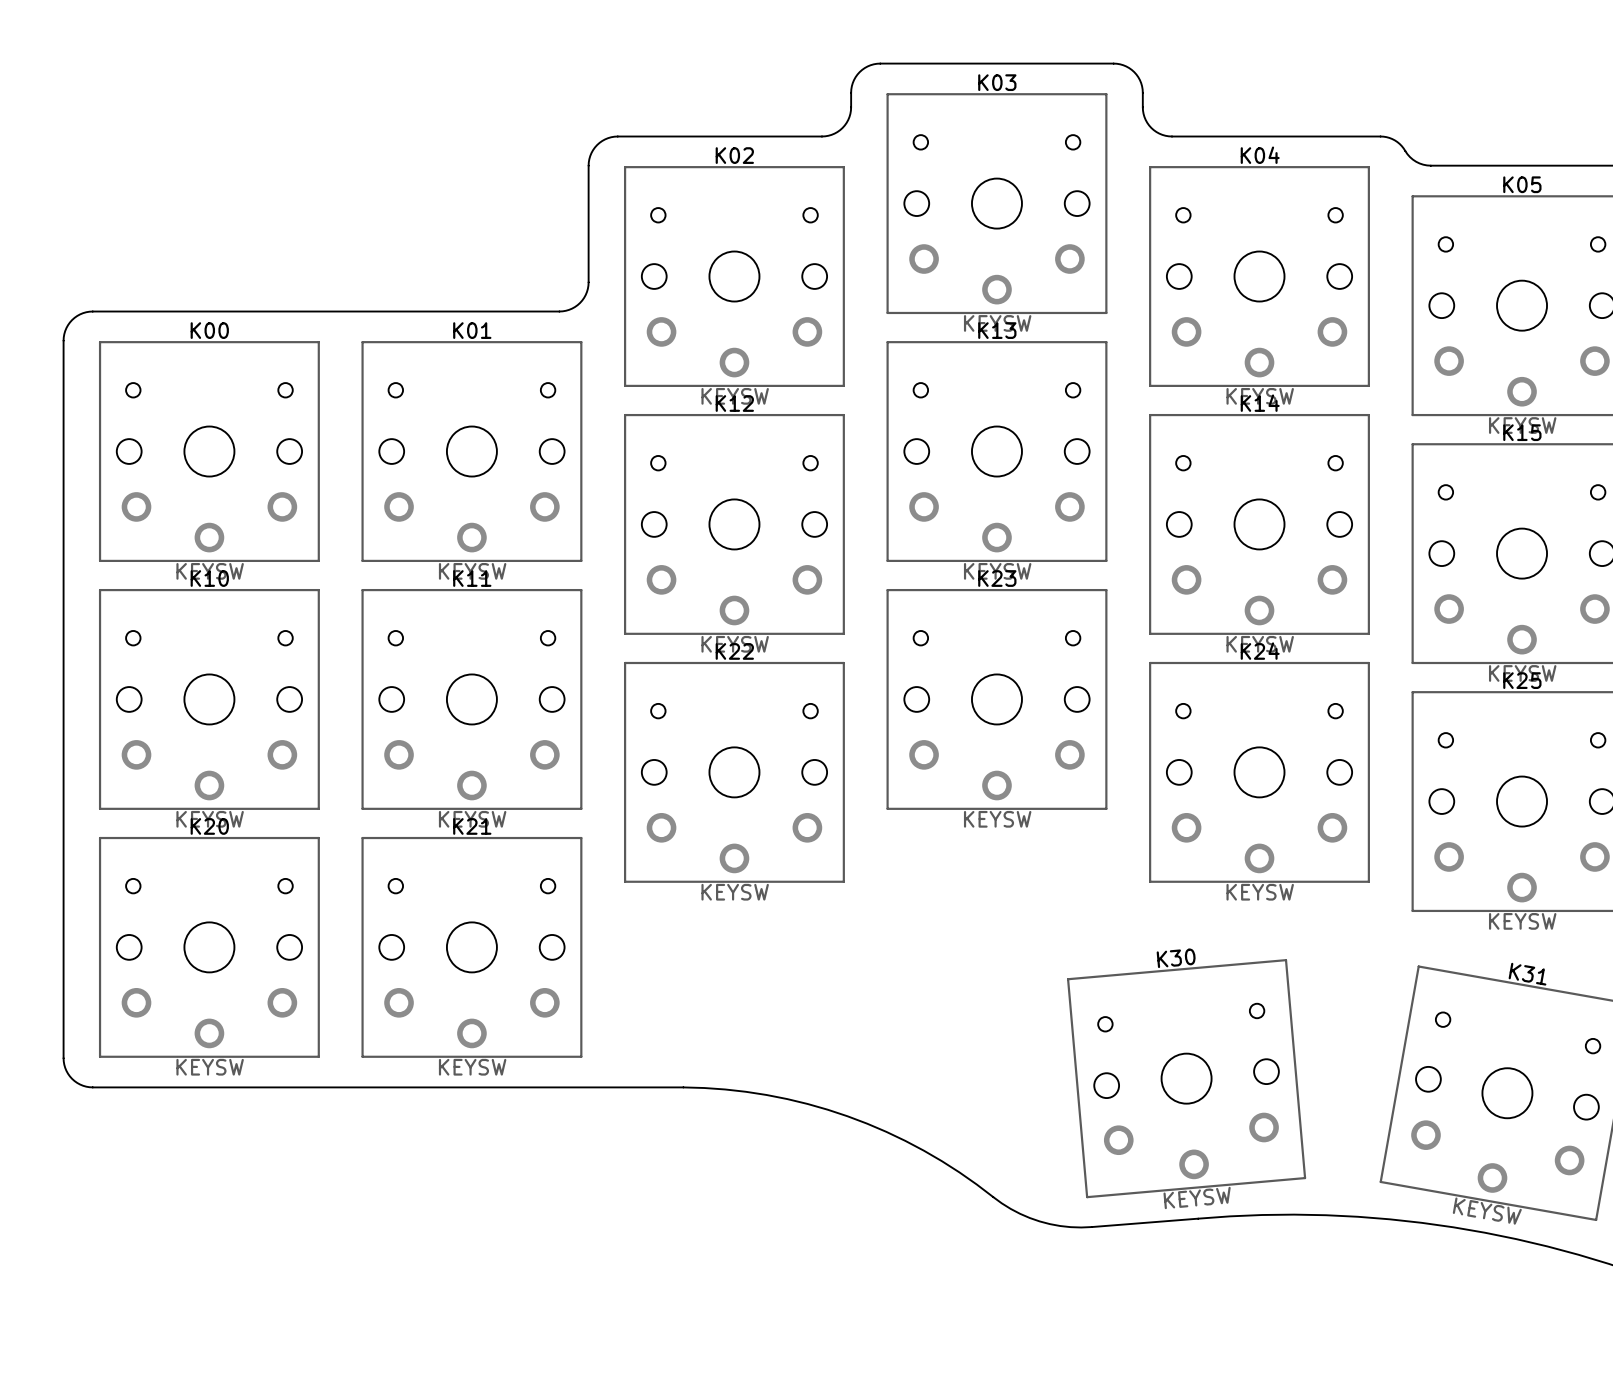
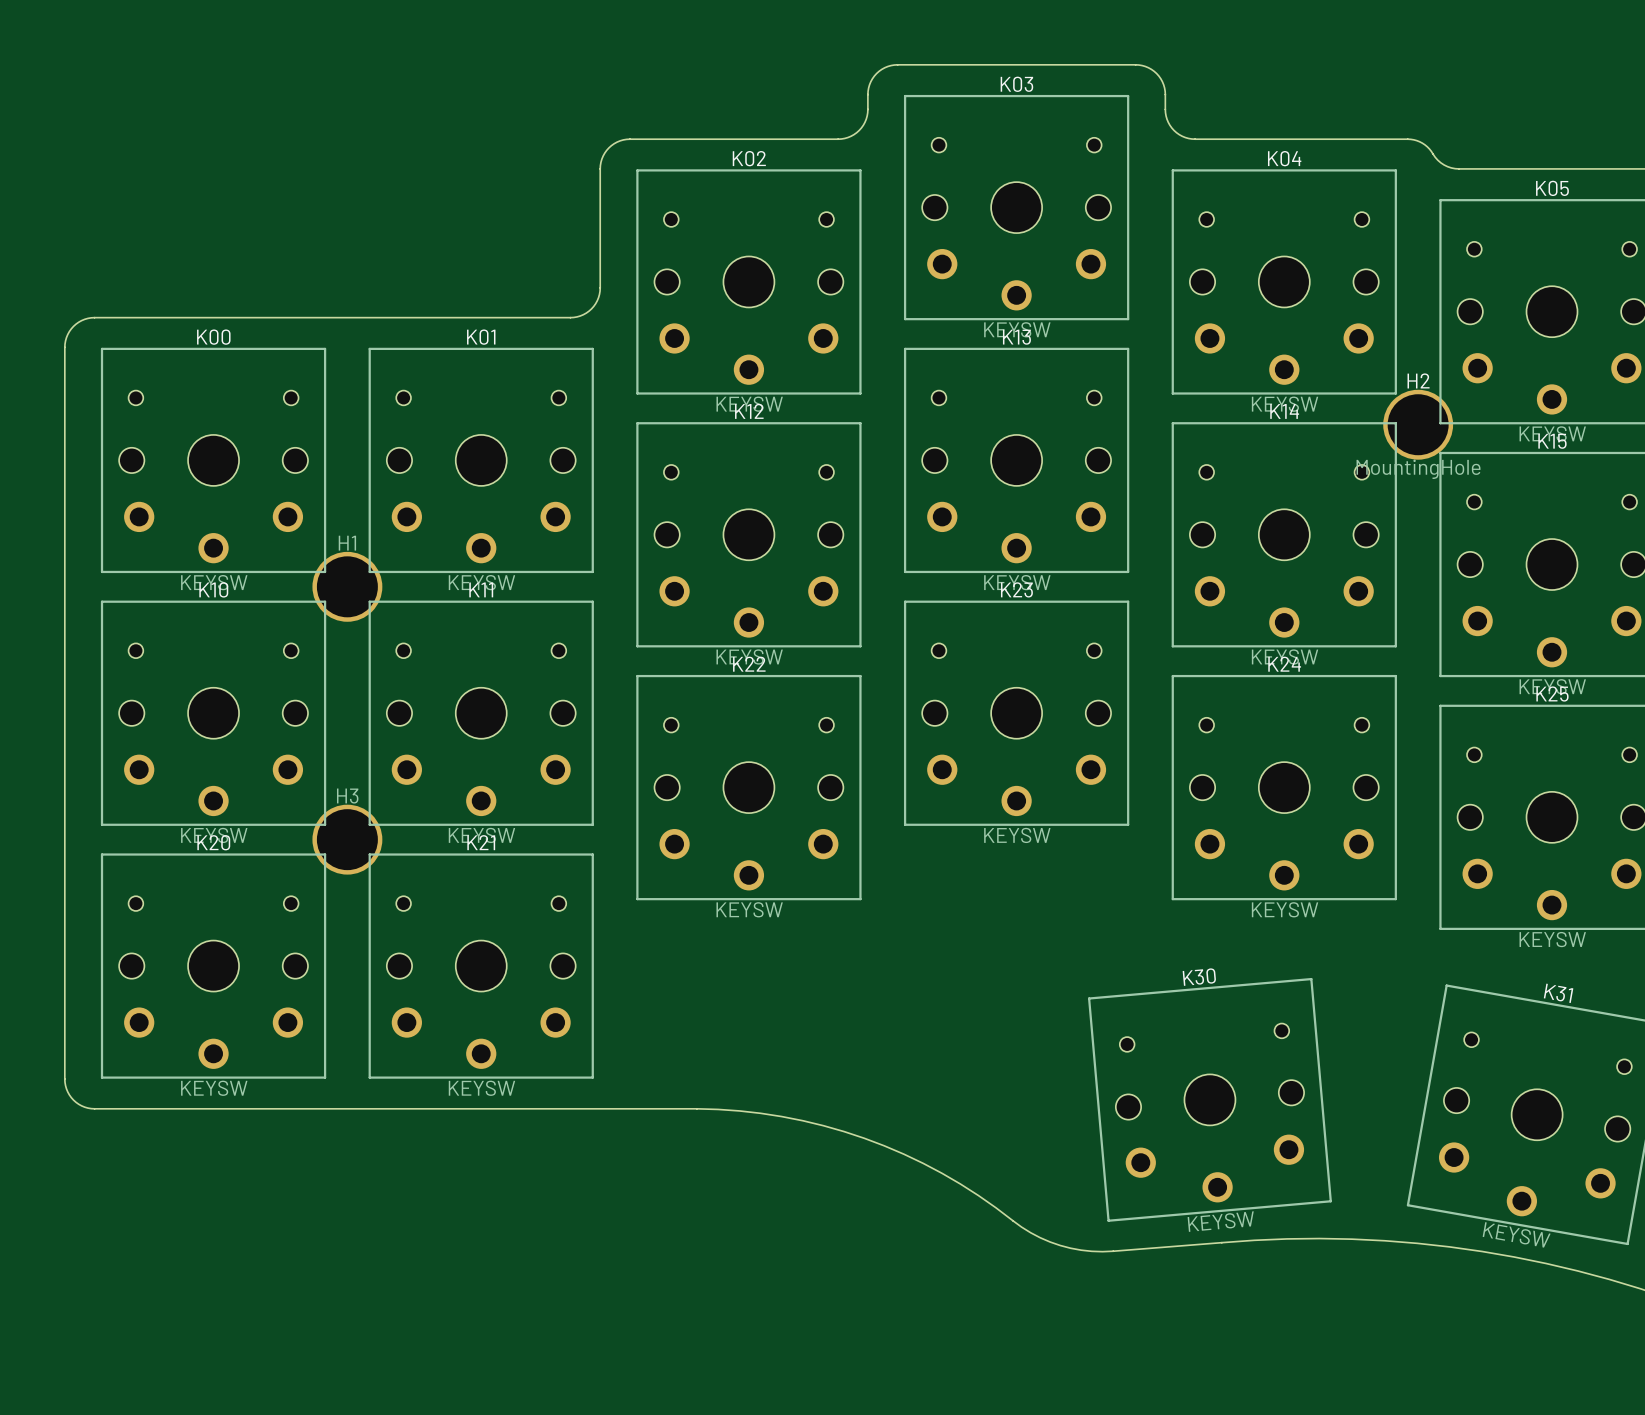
H2: none -> MountingHole (1418, 424)
H1: none -> (347, 586)
H3: none -> (347, 839)

